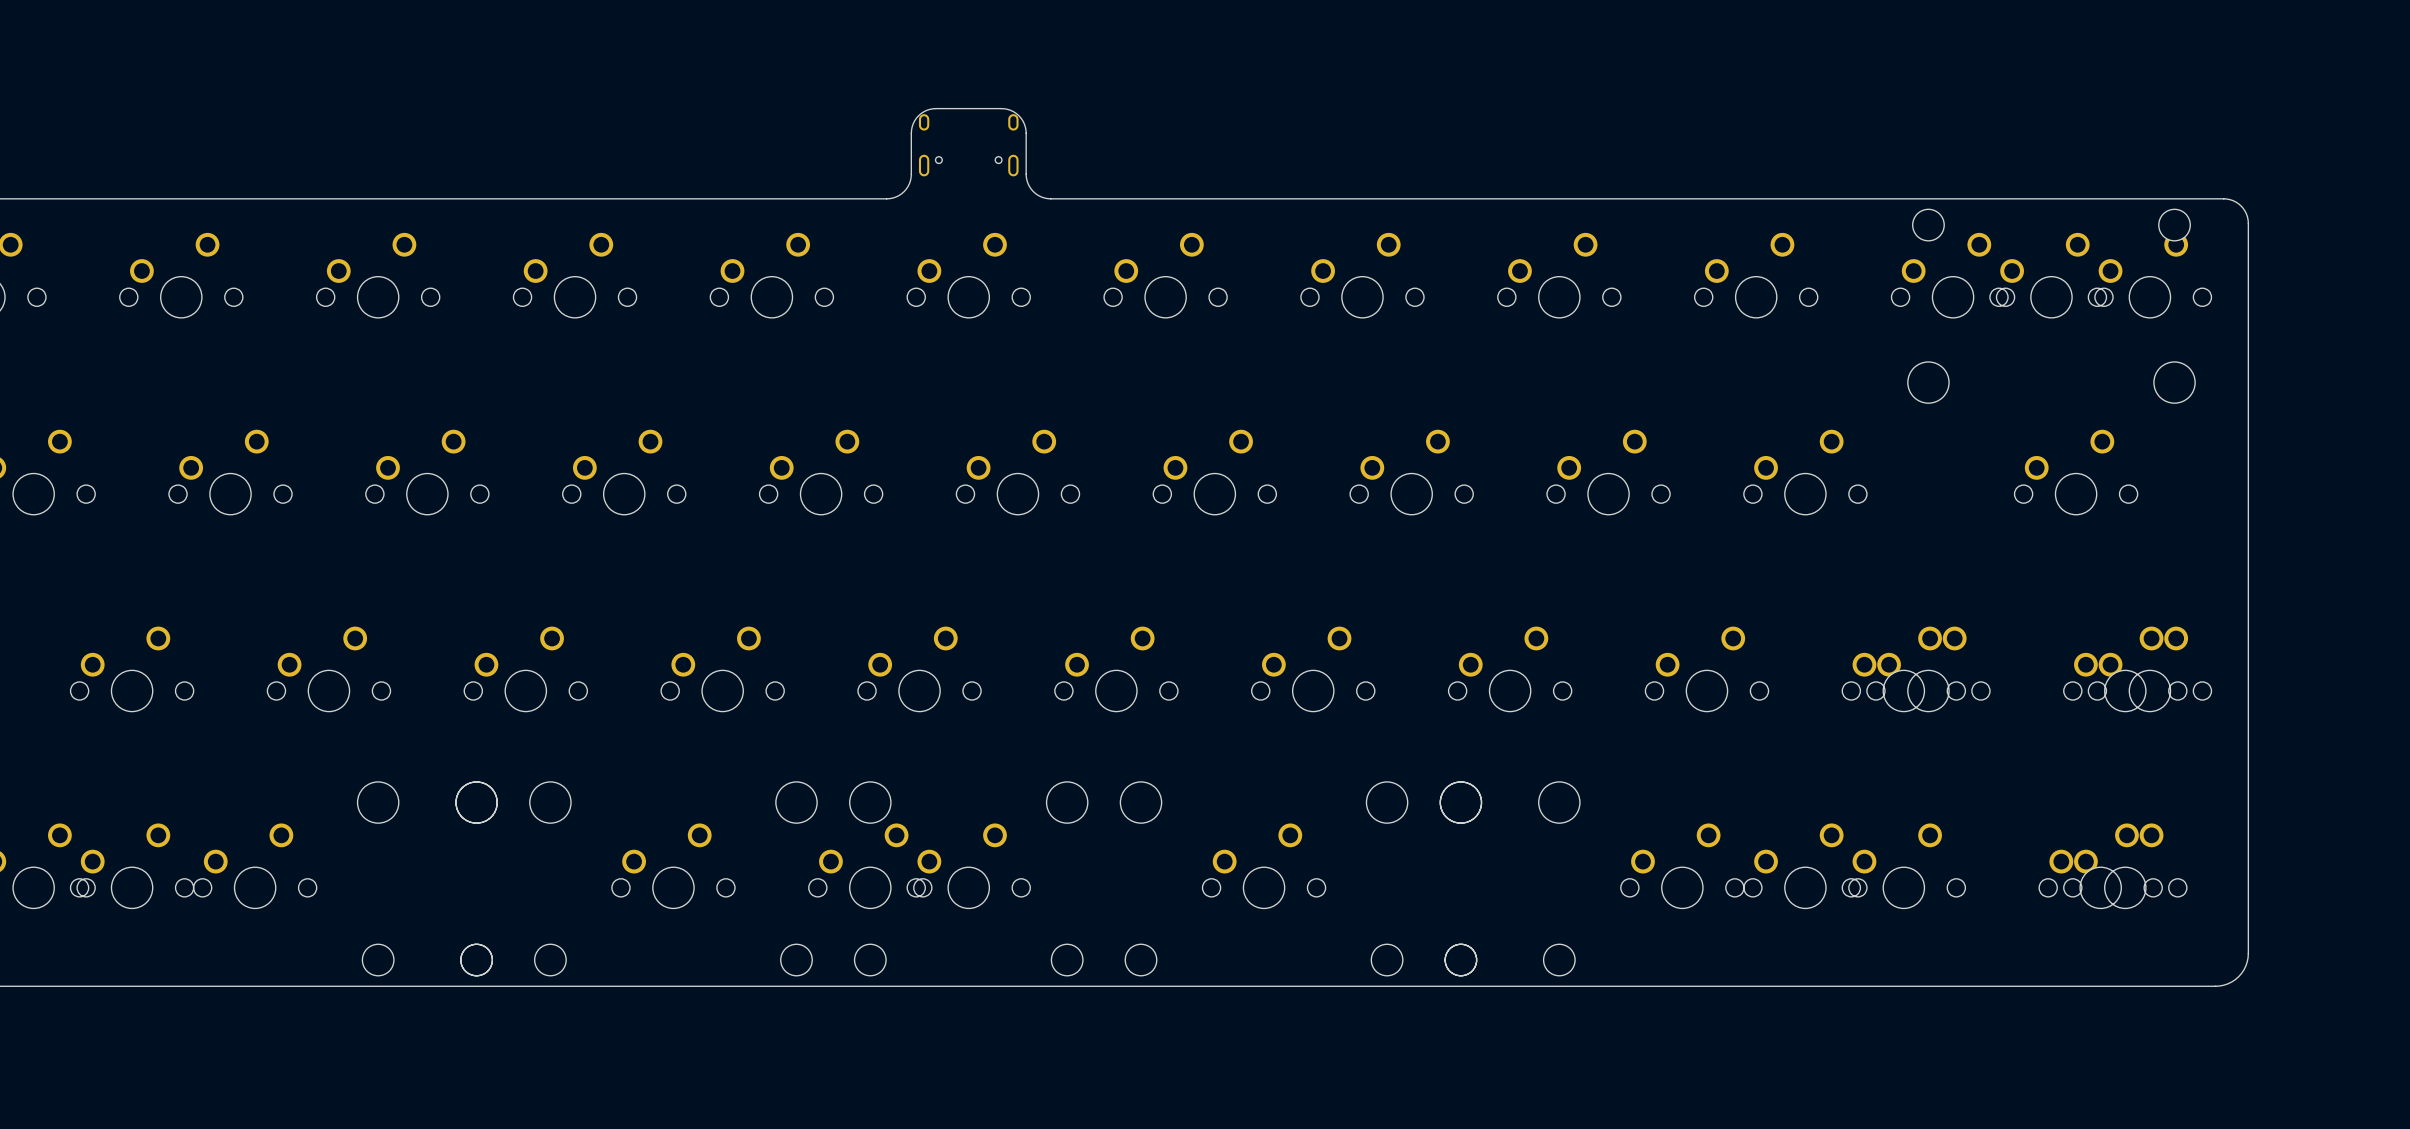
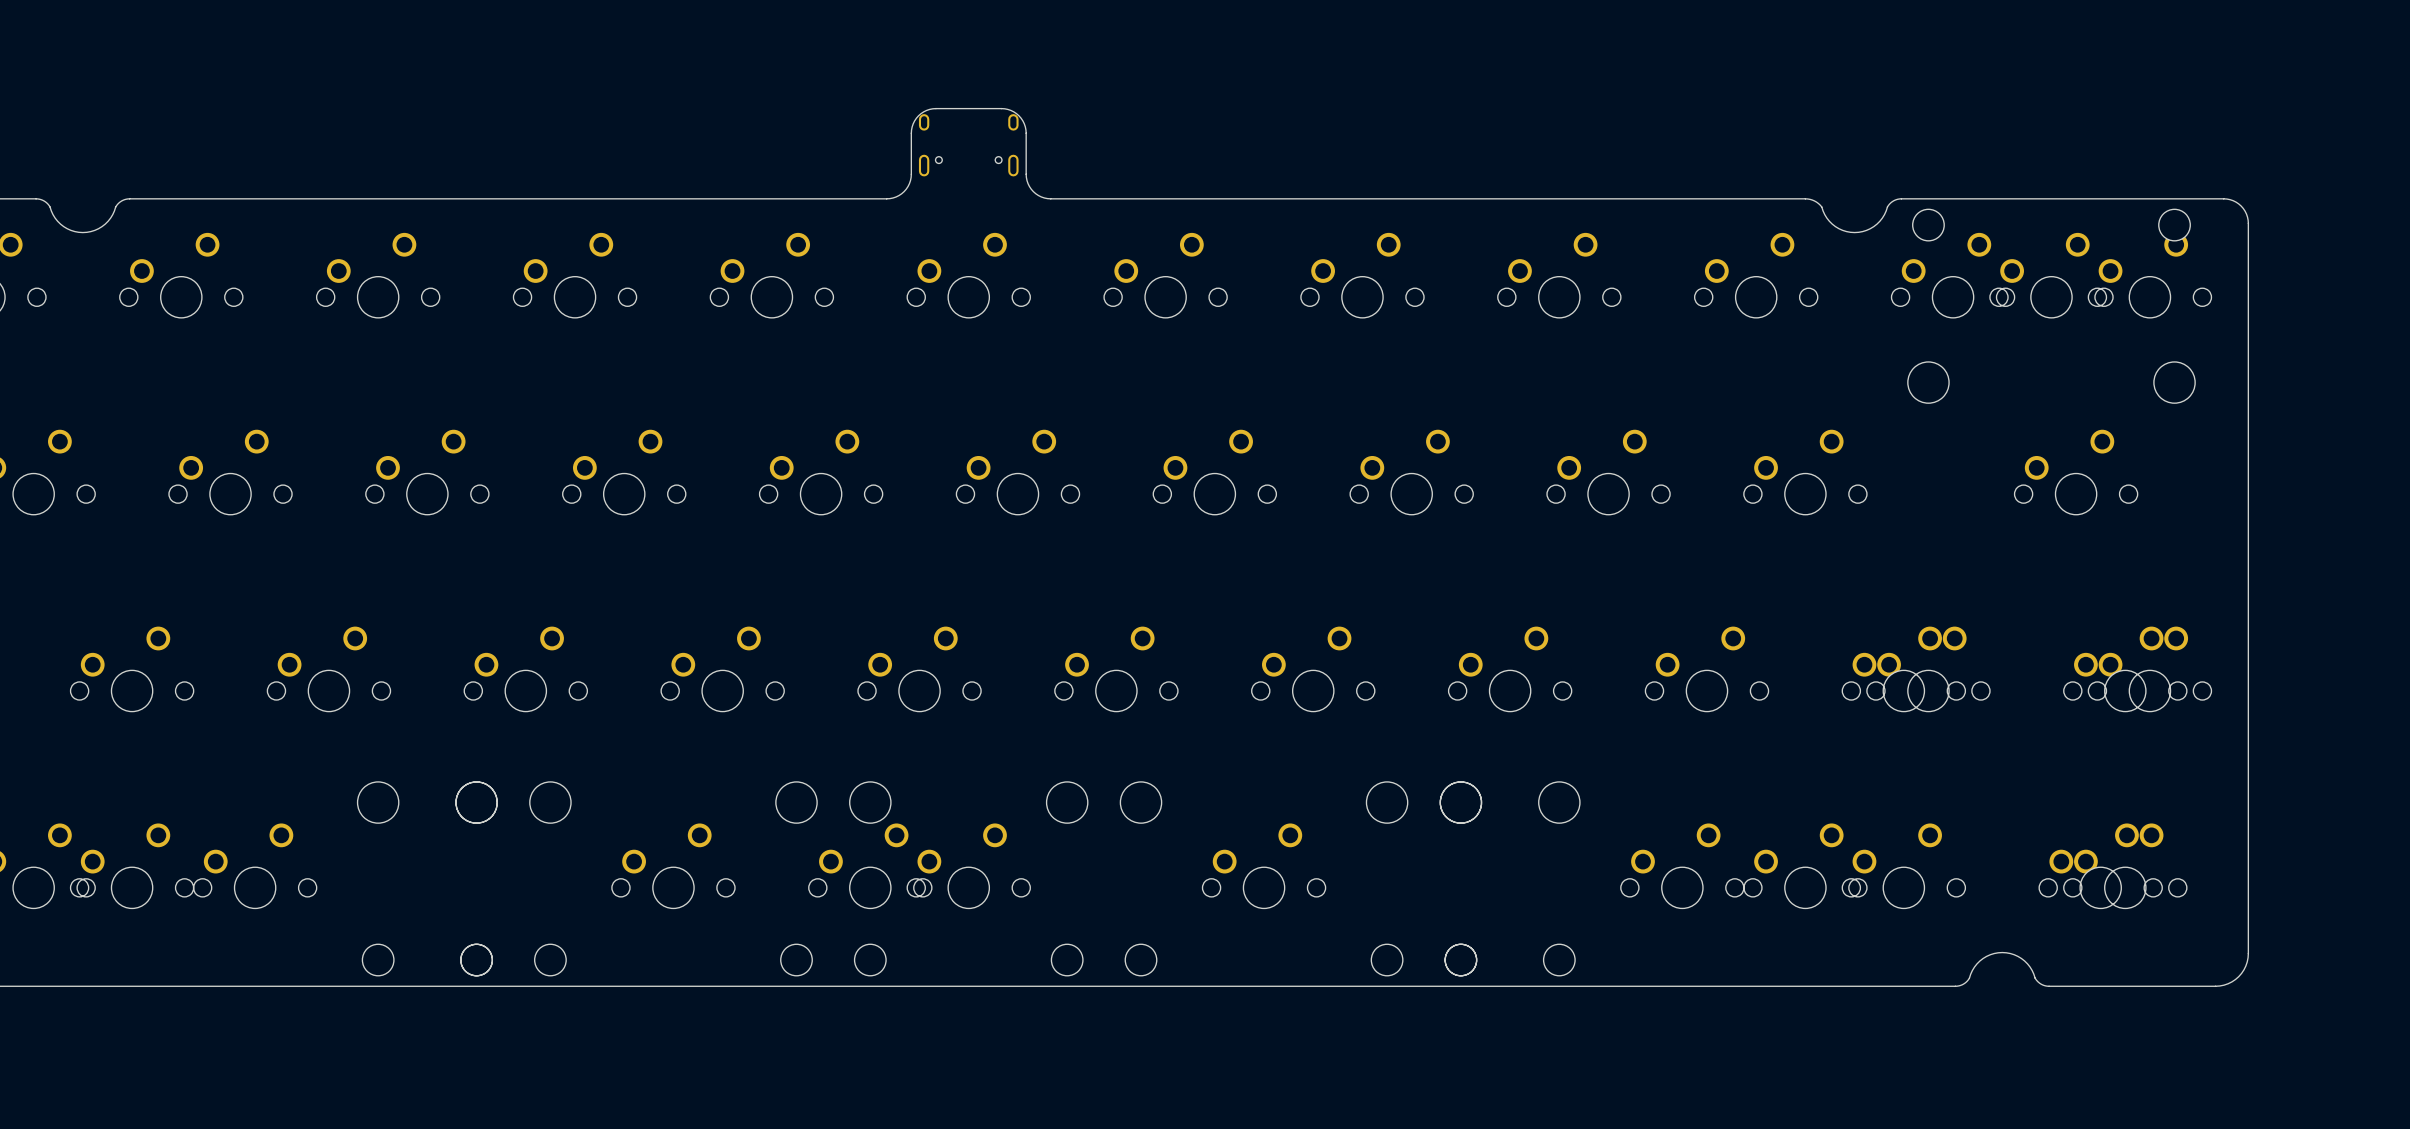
board edge: (36, 198) (129, 198) -> (36, 198) (46, 203) (55, 218) (63, 226) (82, 232) (102, 226) (110, 218) (118, 203) (129, 198)
board edge: (1805, 198) (1901, 198) -> (1805, 198) (1818, 203) (1826, 218) (1835, 226) (1854, 232) (1873, 226) (1882, 218) (1890, 203) (1901, 198)
board edge: (1955, 986) (2049, 986) -> (1955, 986) (1966, 982) (1974, 967) (1983, 958) (2002, 952) (2021, 958) (2030, 967) (2038, 982) (2049, 986)

